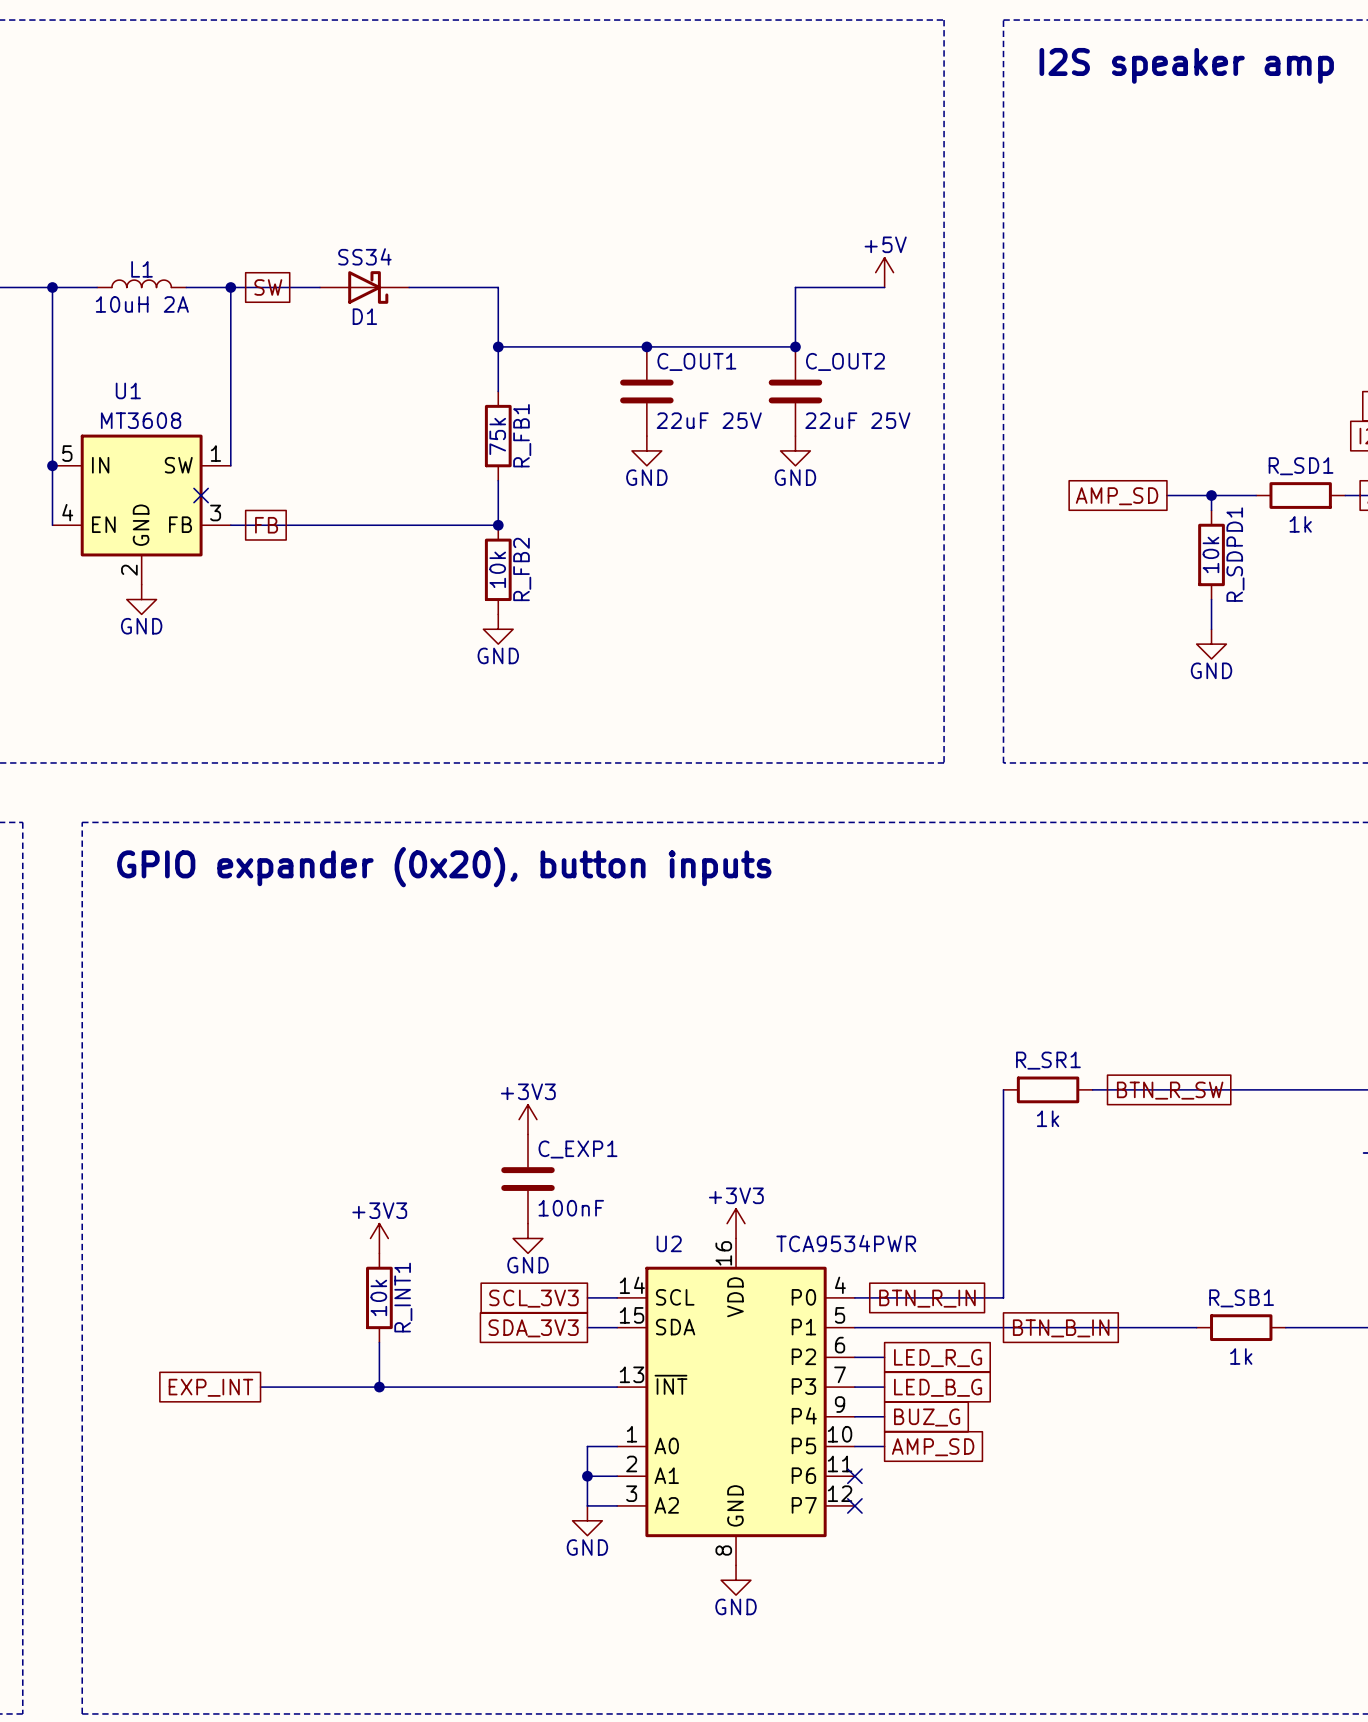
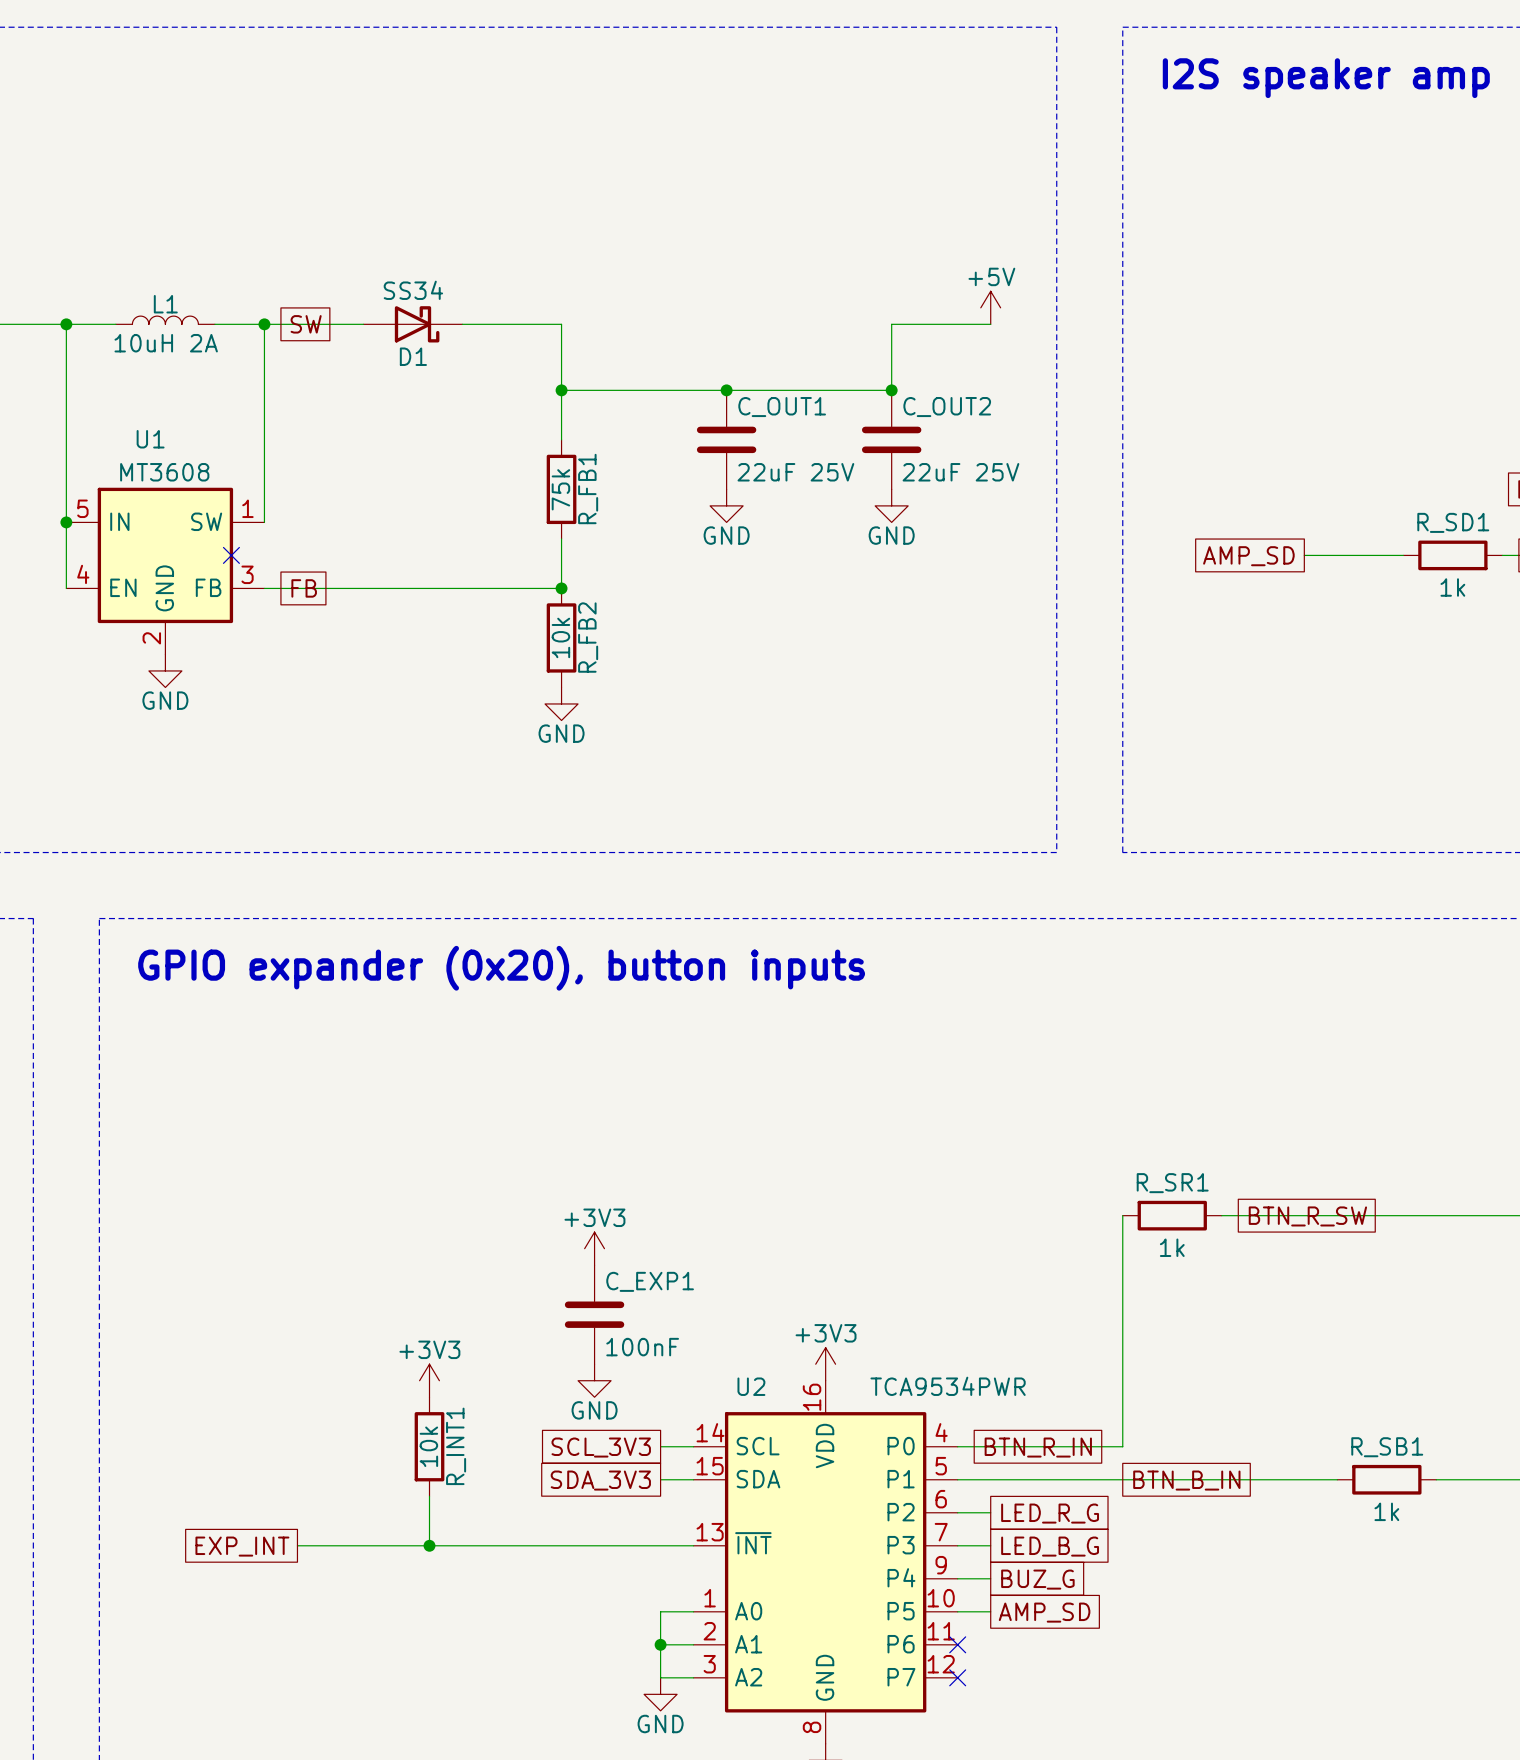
wire: (1211, 495) (1211, 510) -> none
junction: (1211, 495) -> none
R_SDPD1: 10k (1211, 554) -> none
wire: (1211, 599) (1211, 629) -> none
power symbol: GND (1211, 644) -> none

